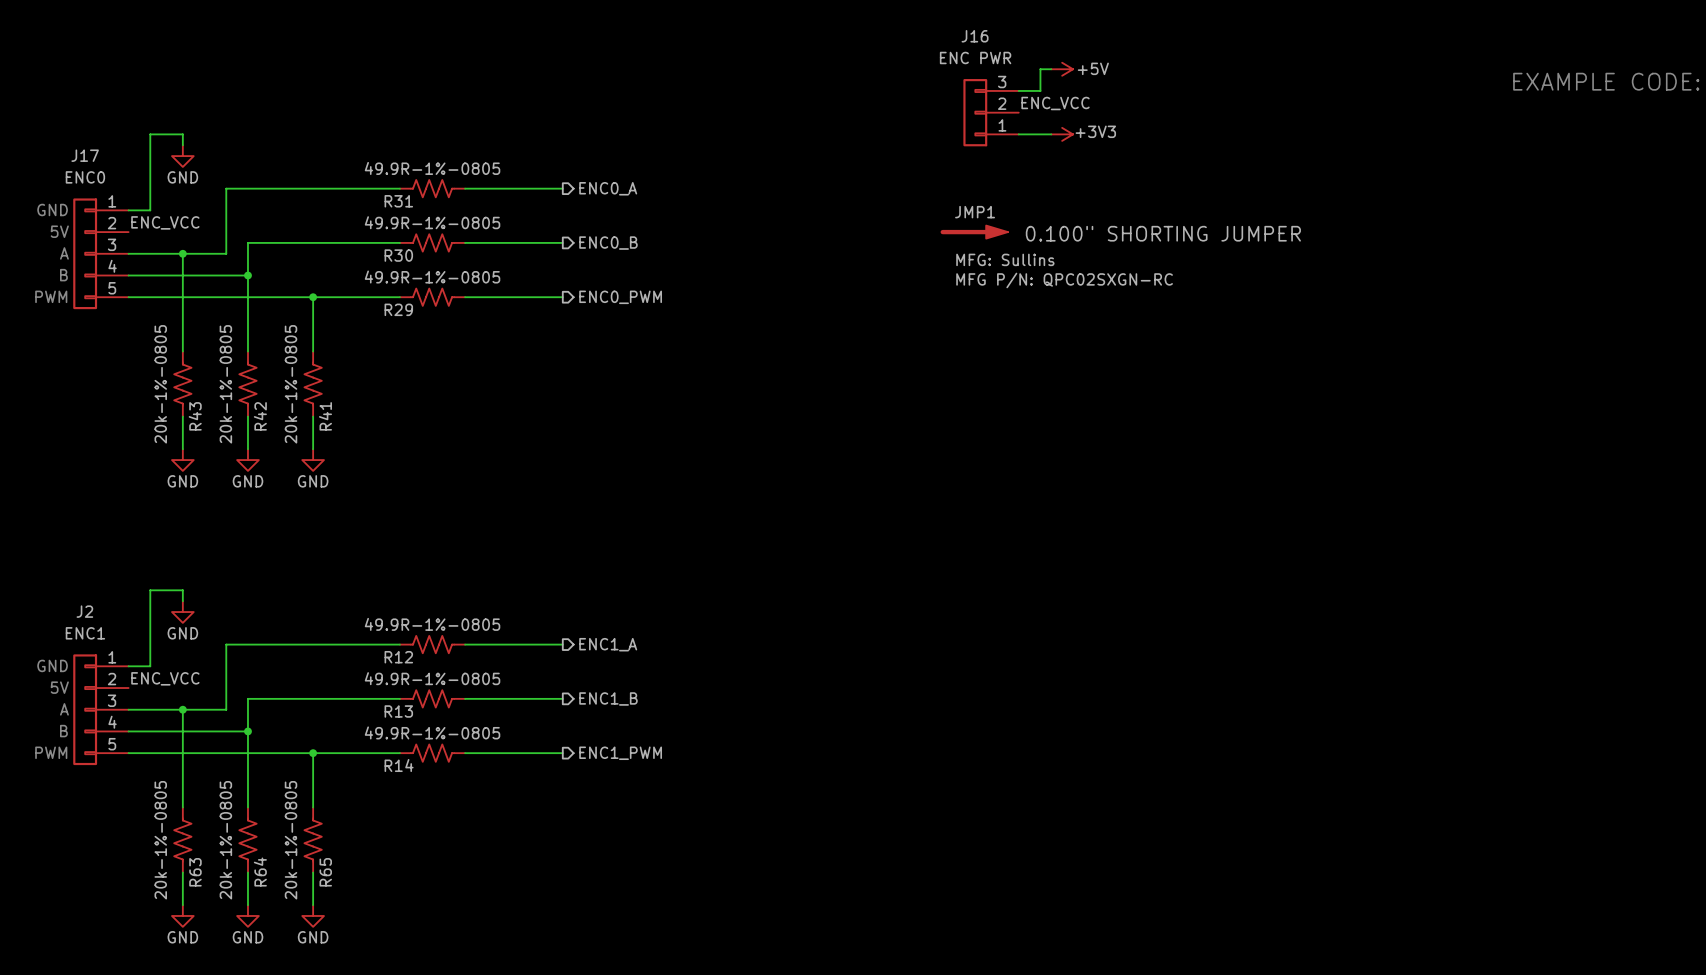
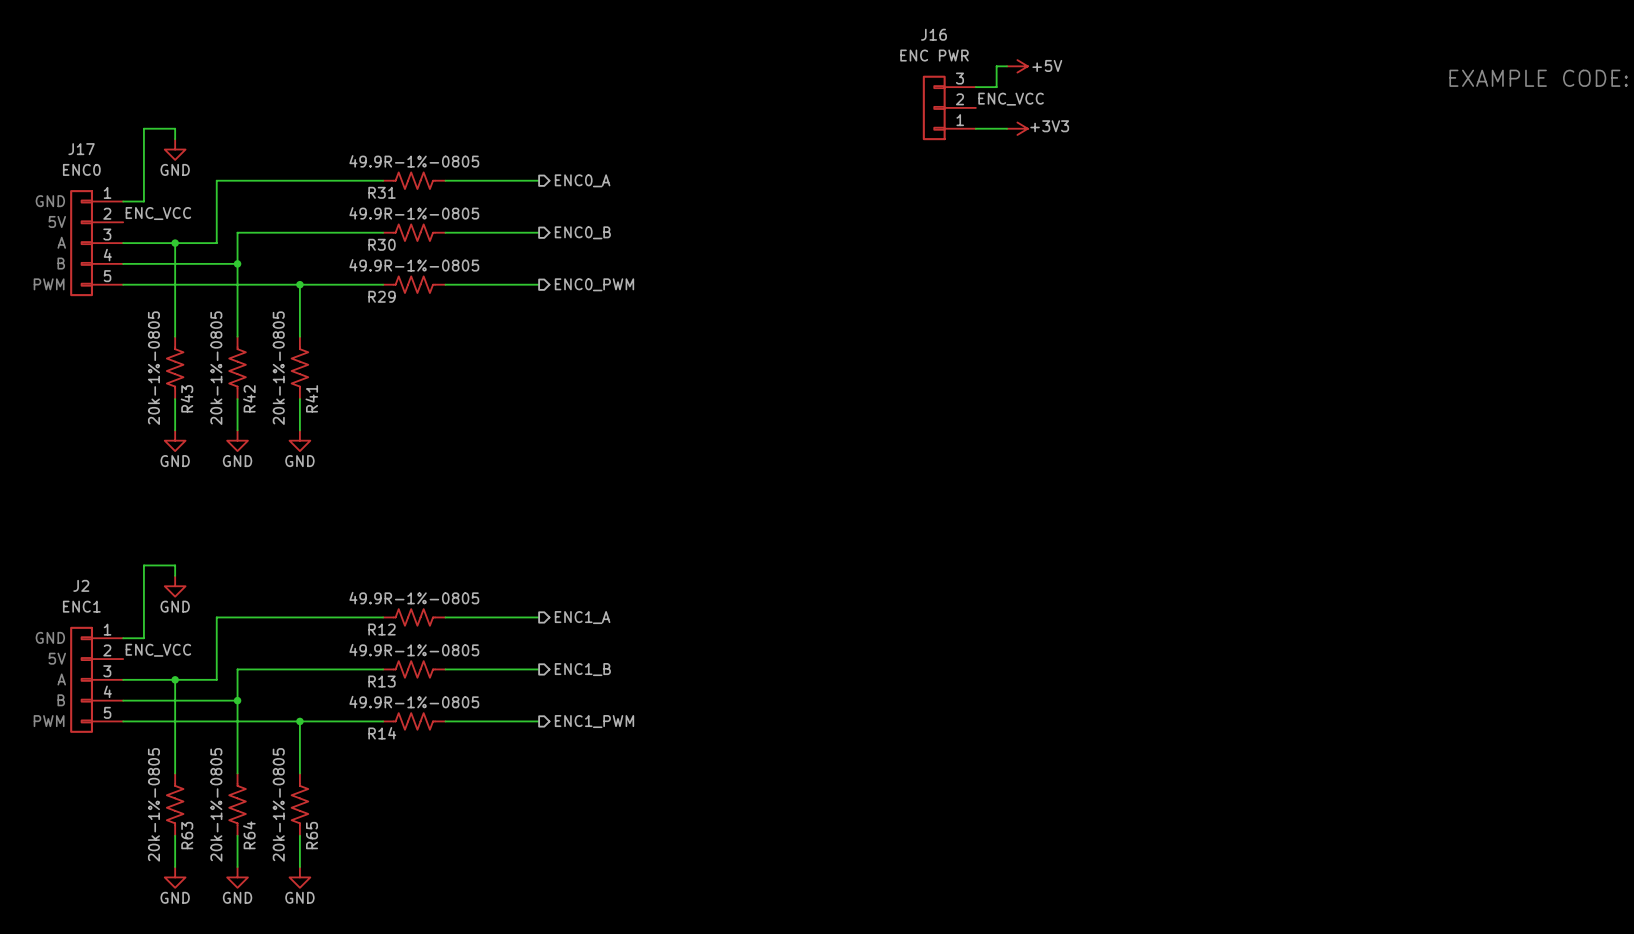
JMP1: 0.100" SHORTING JUMPER (974, 232) -> none

